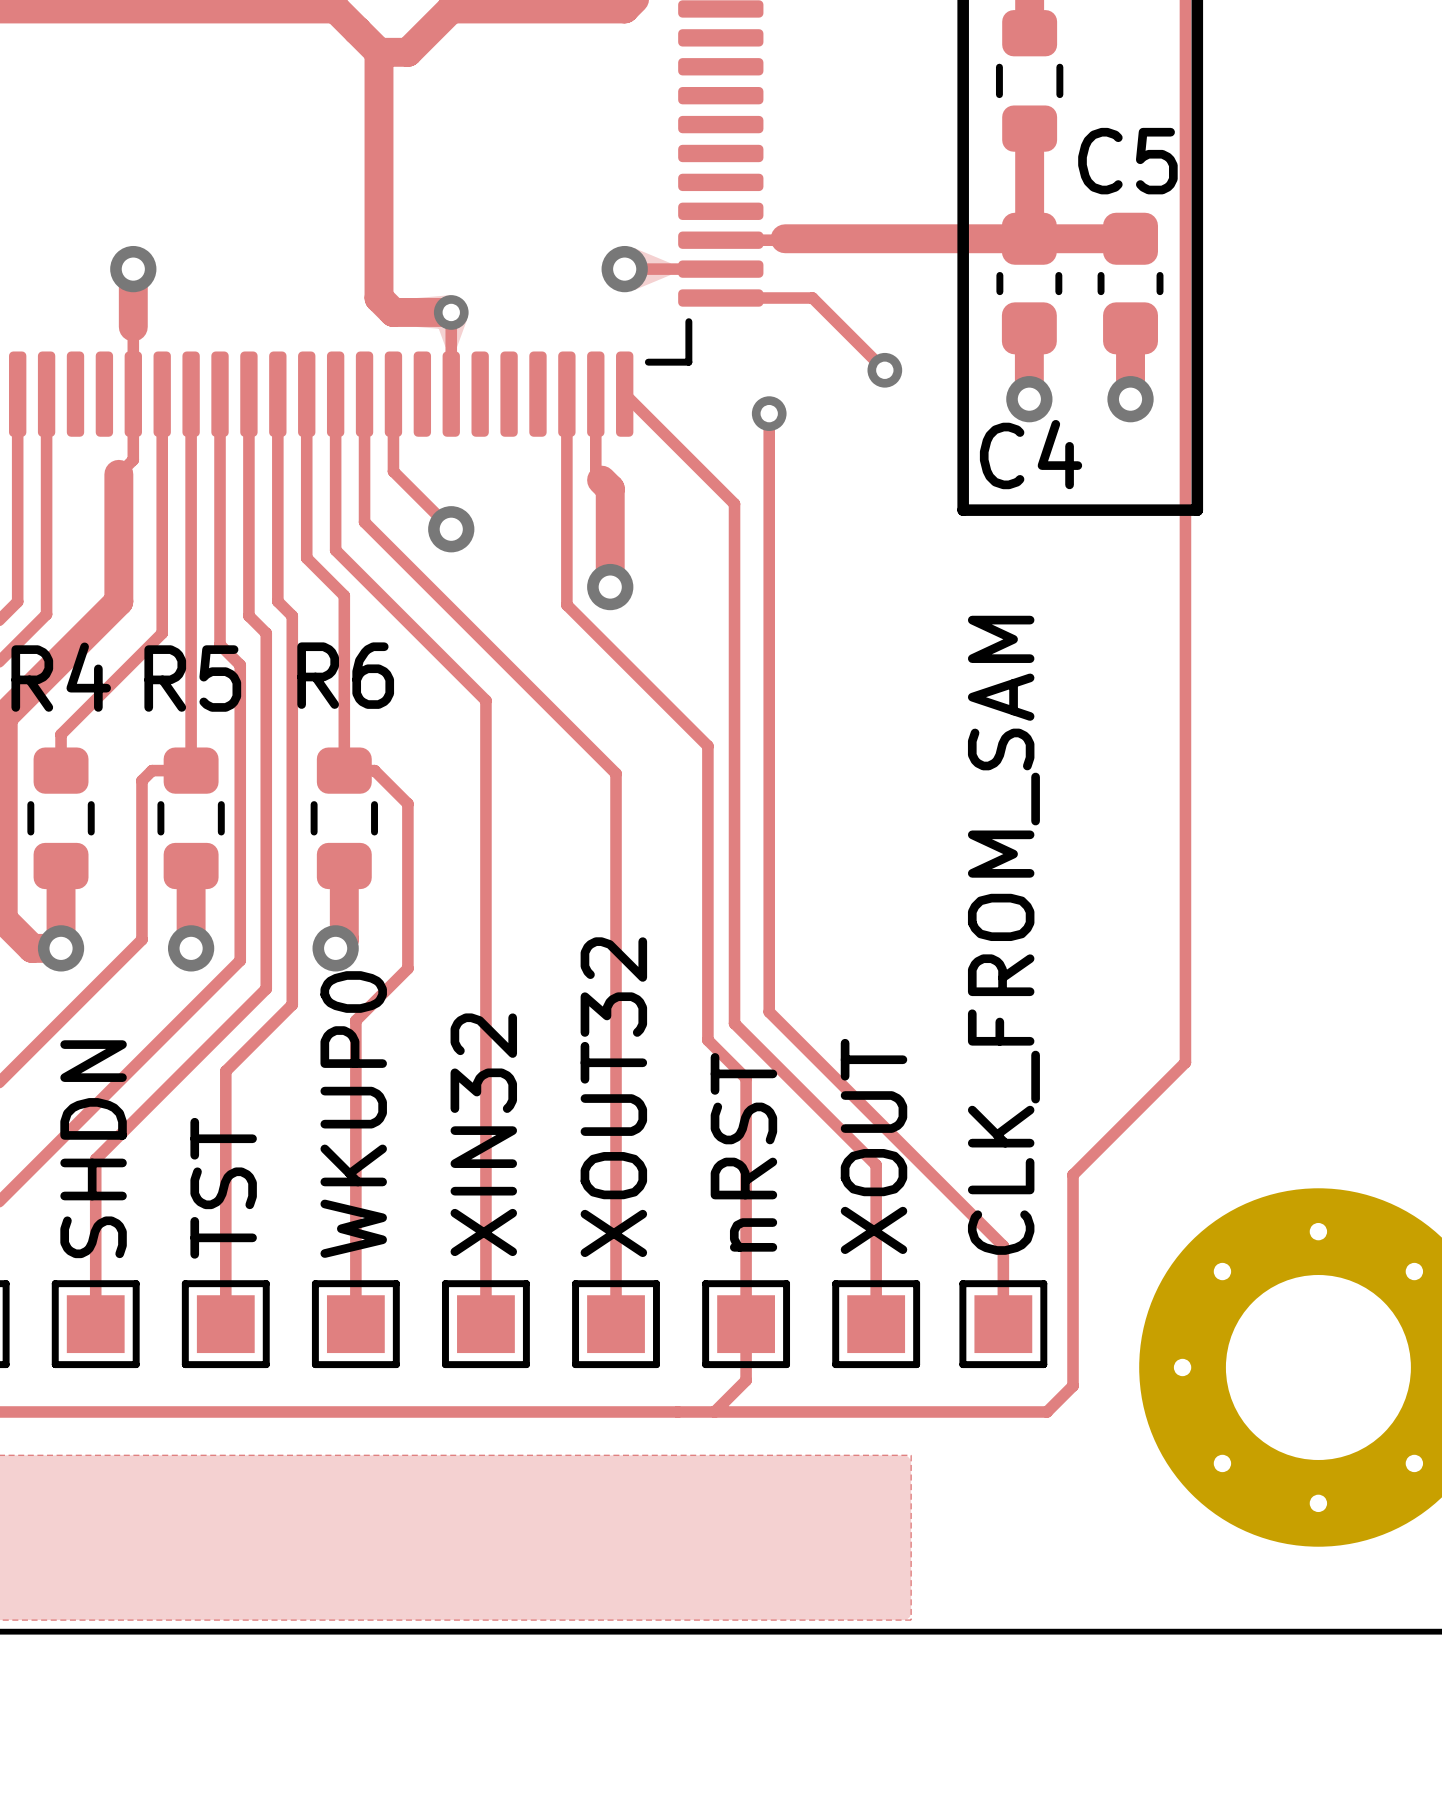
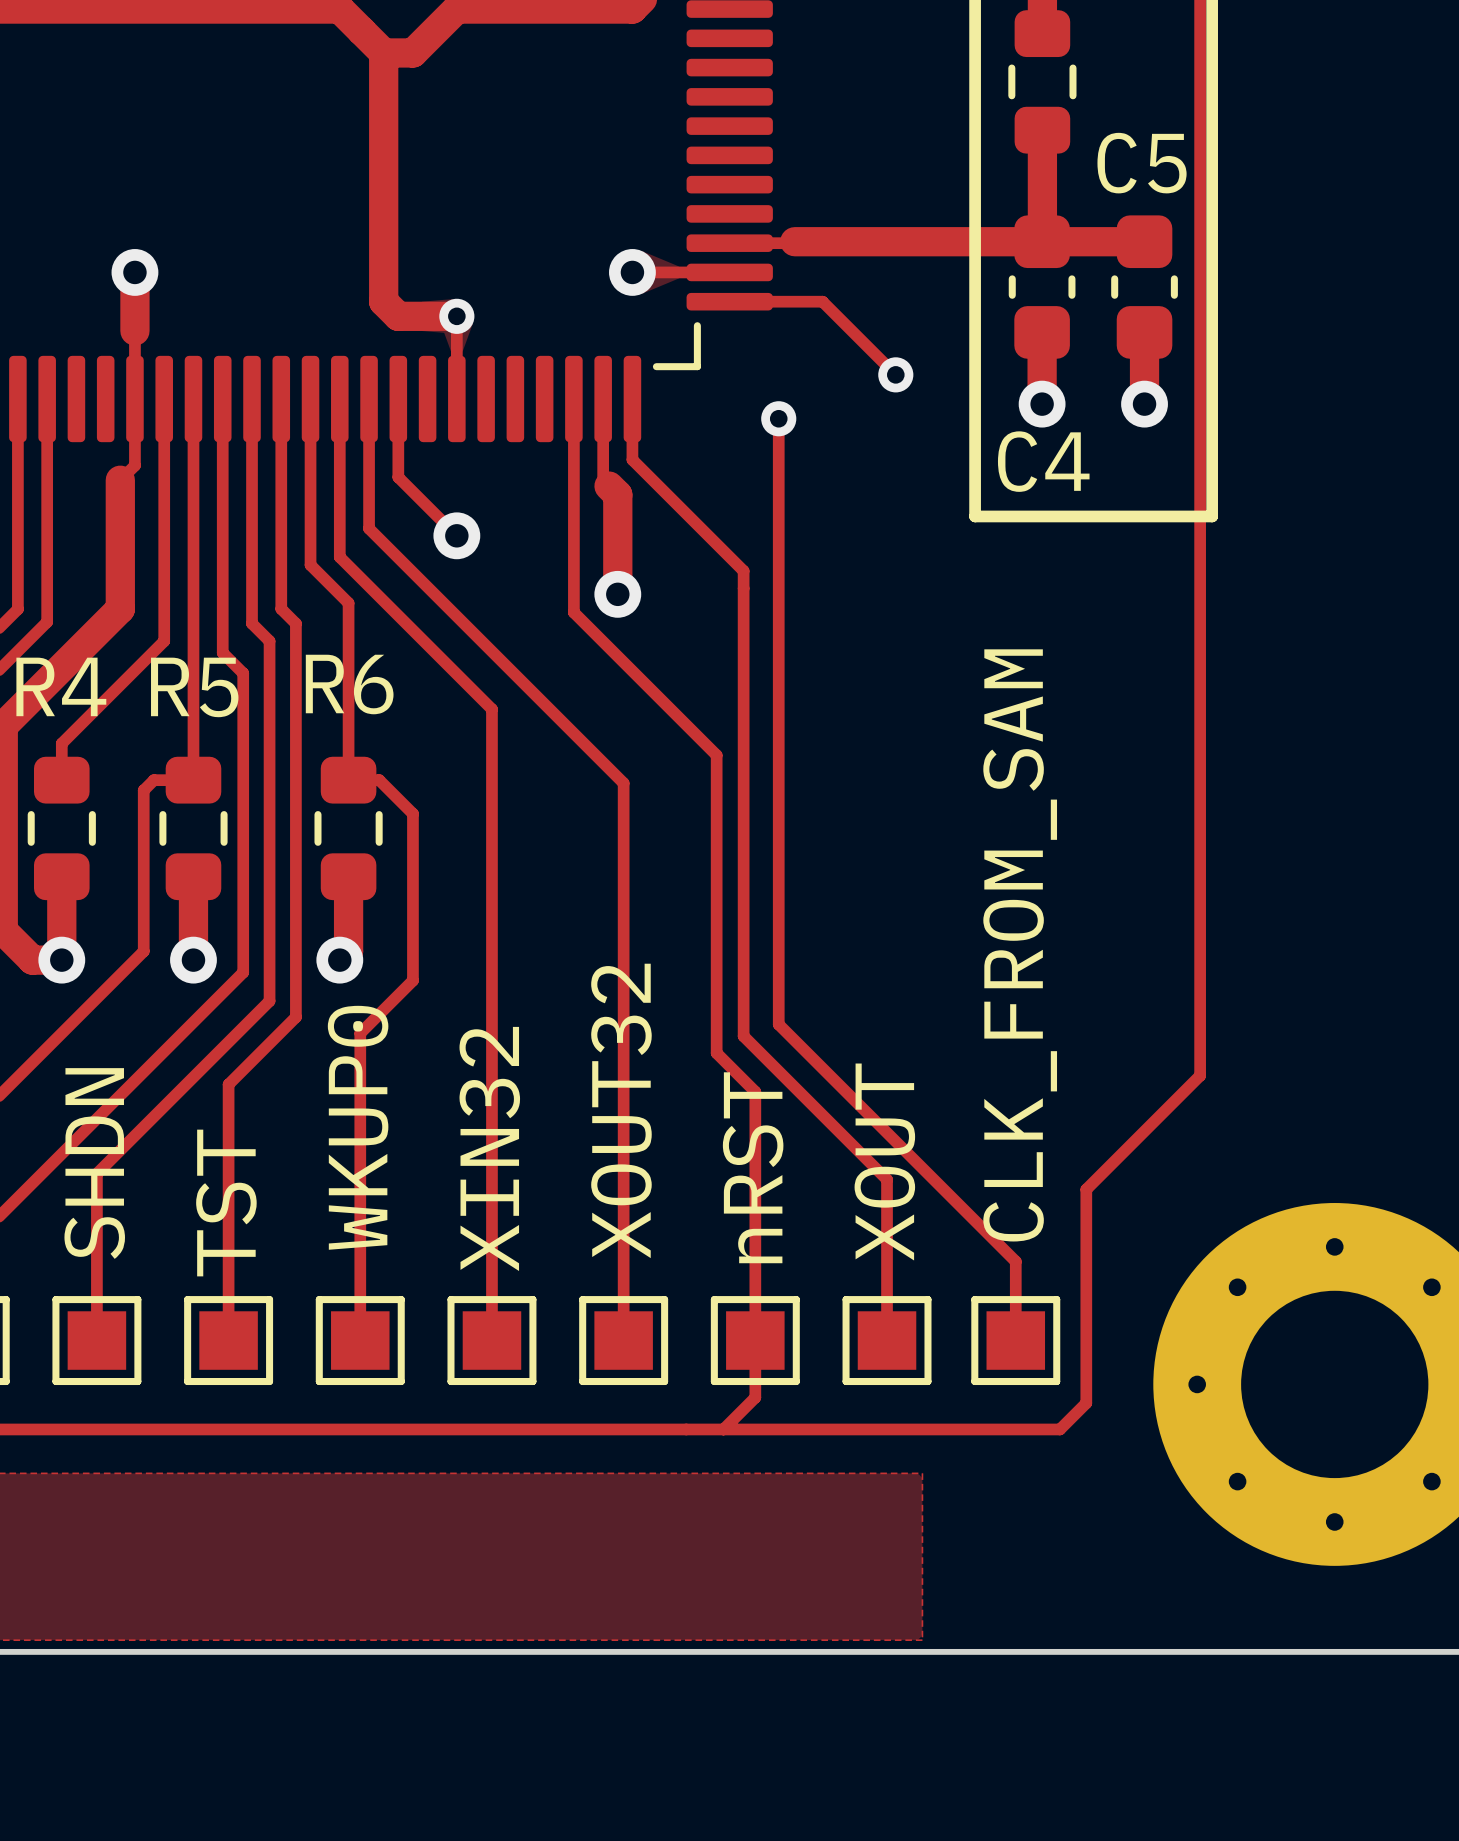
track: (624, 394) (734, 503) (734, 564) -> (632, 399) (632, 459) (743, 571)

